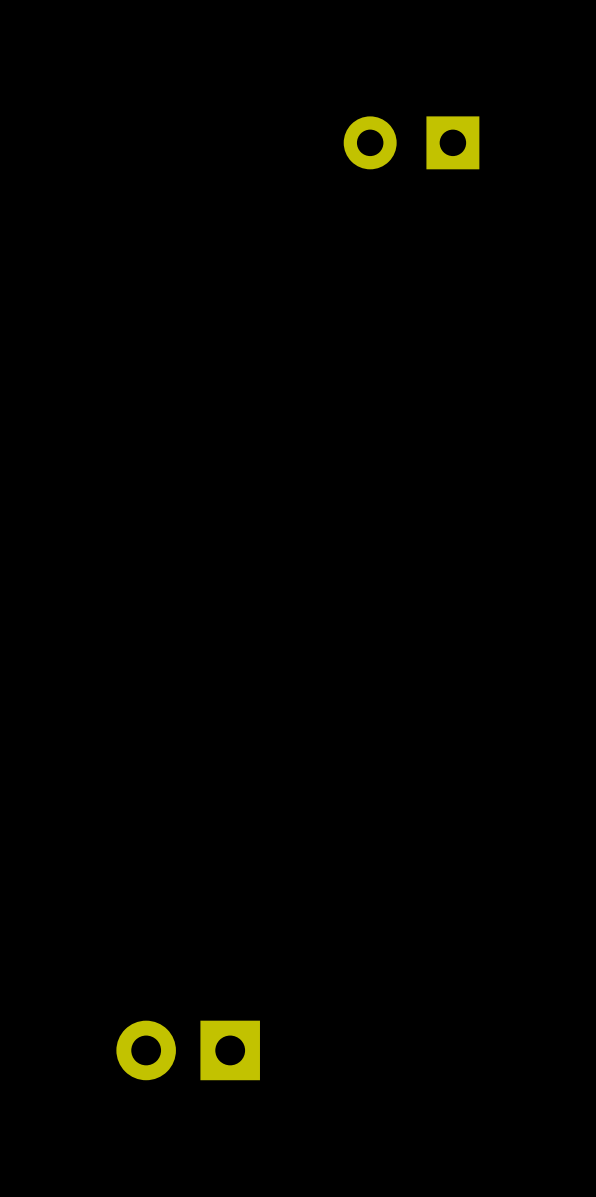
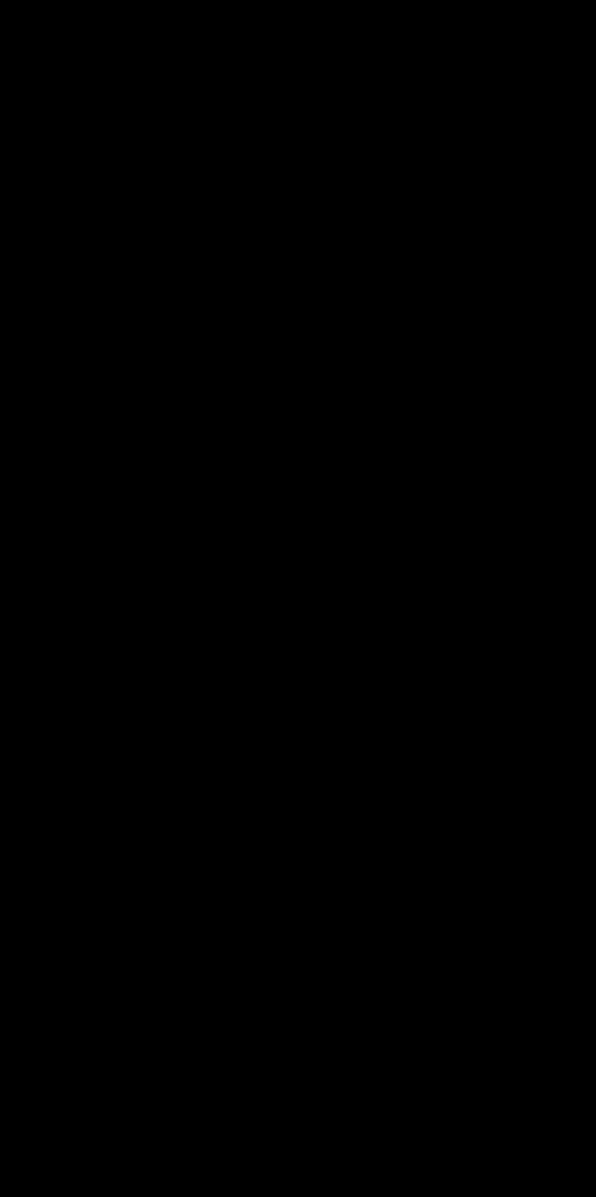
part: (411, 142) -> none
part: (188, 1050) -> none

